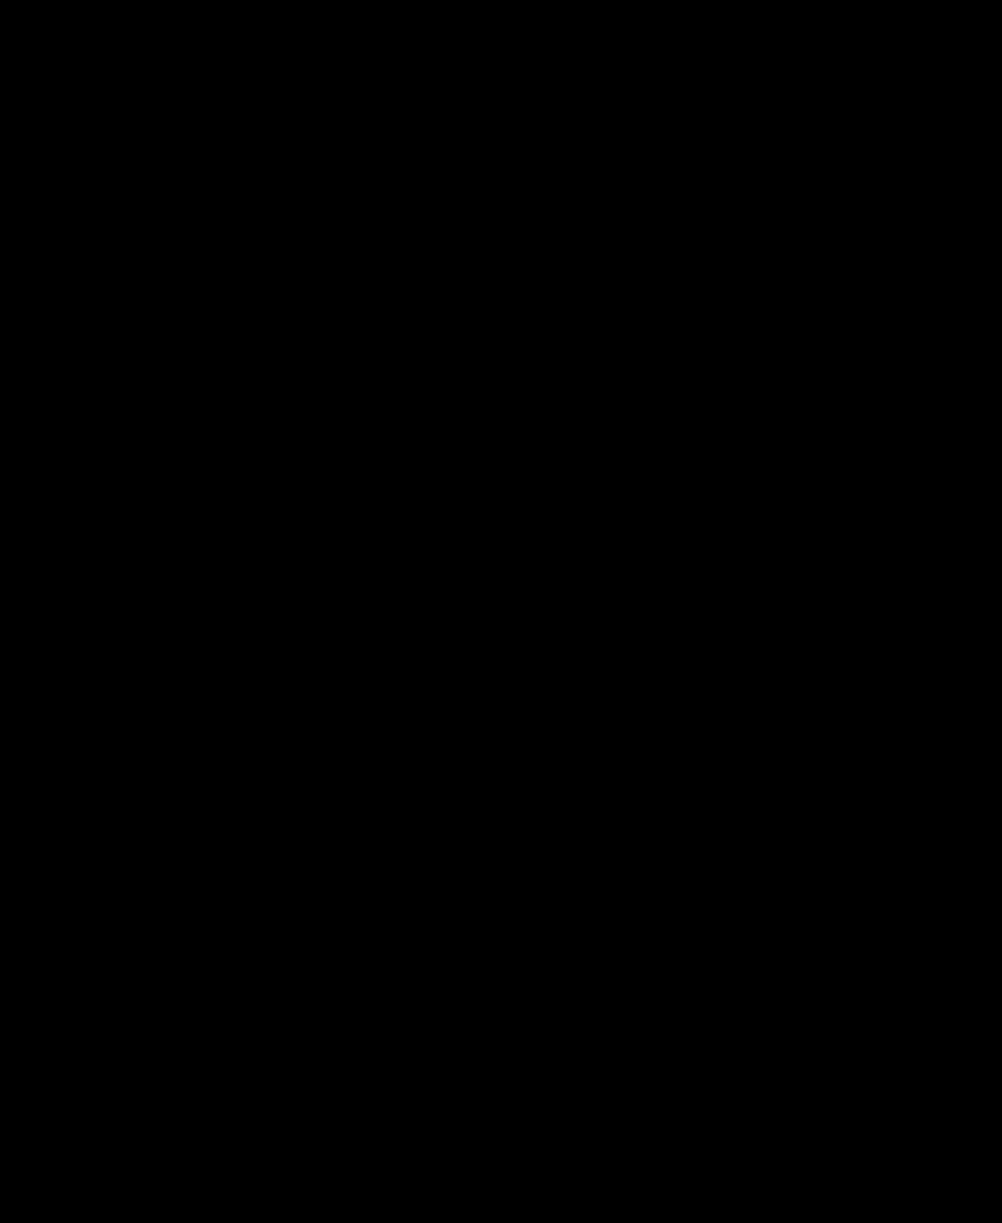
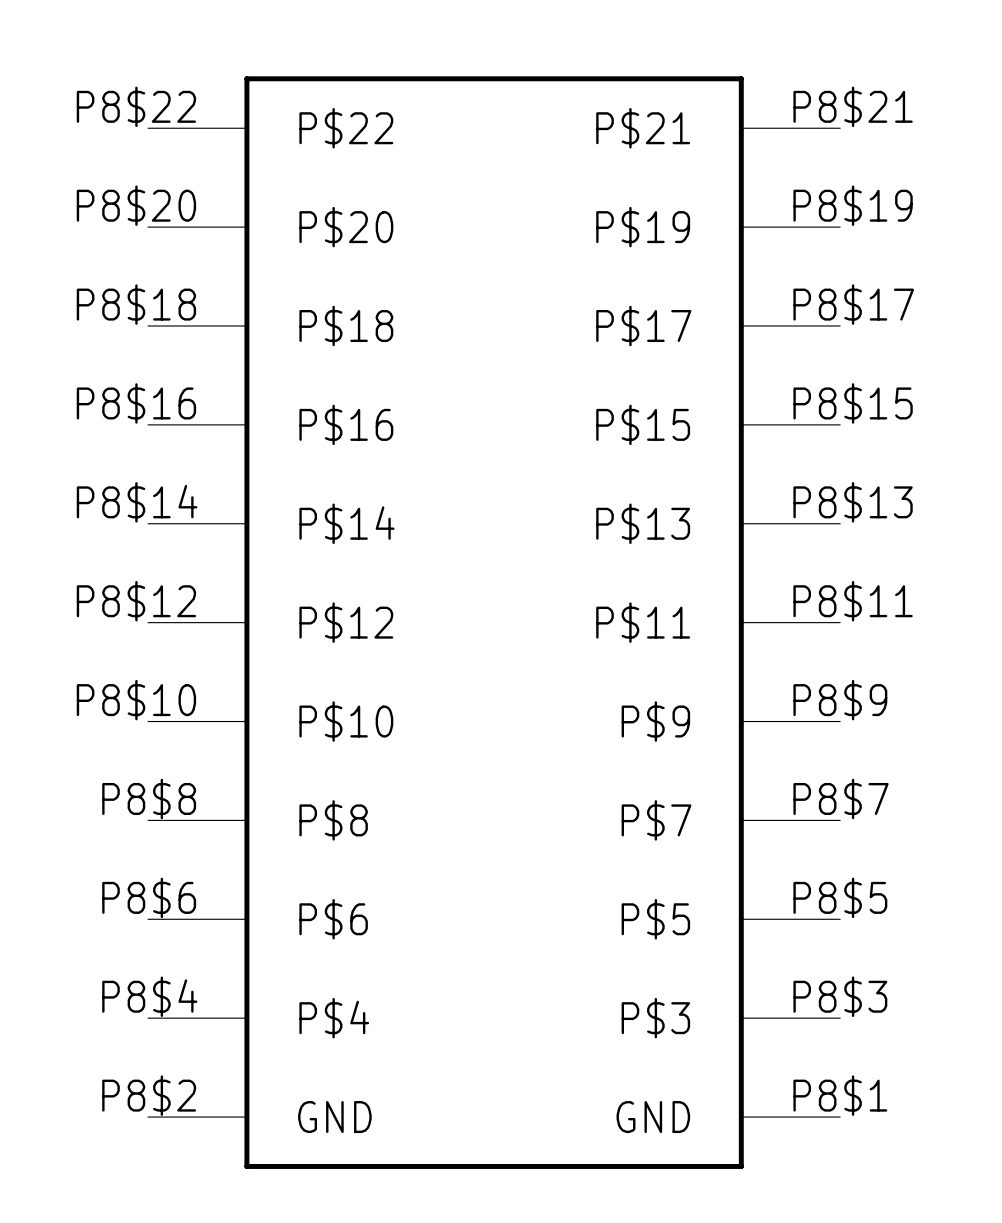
part: none -> (494, 622)

